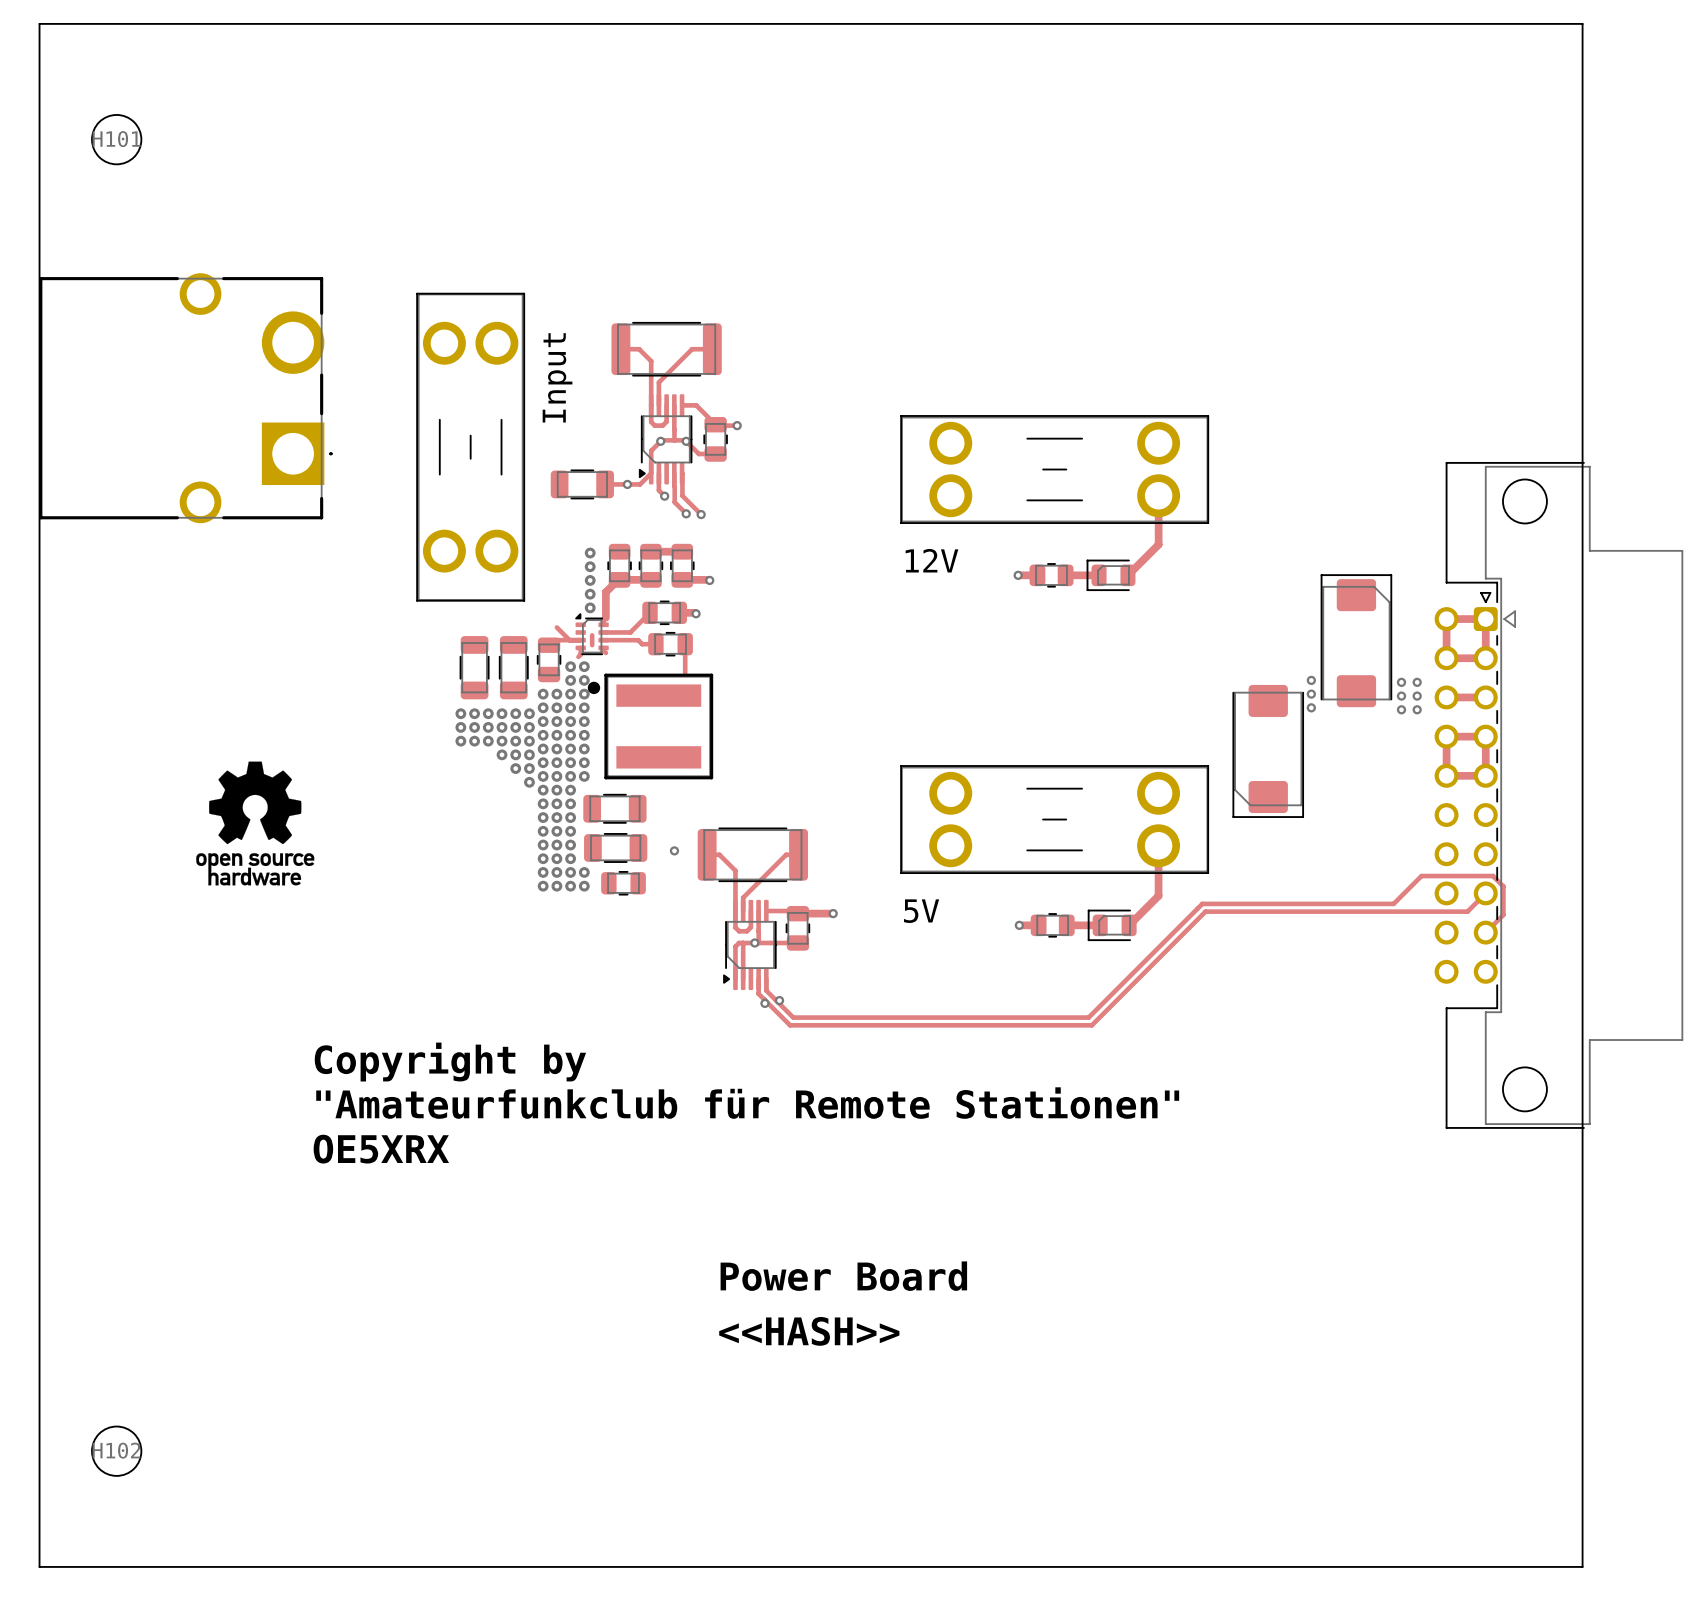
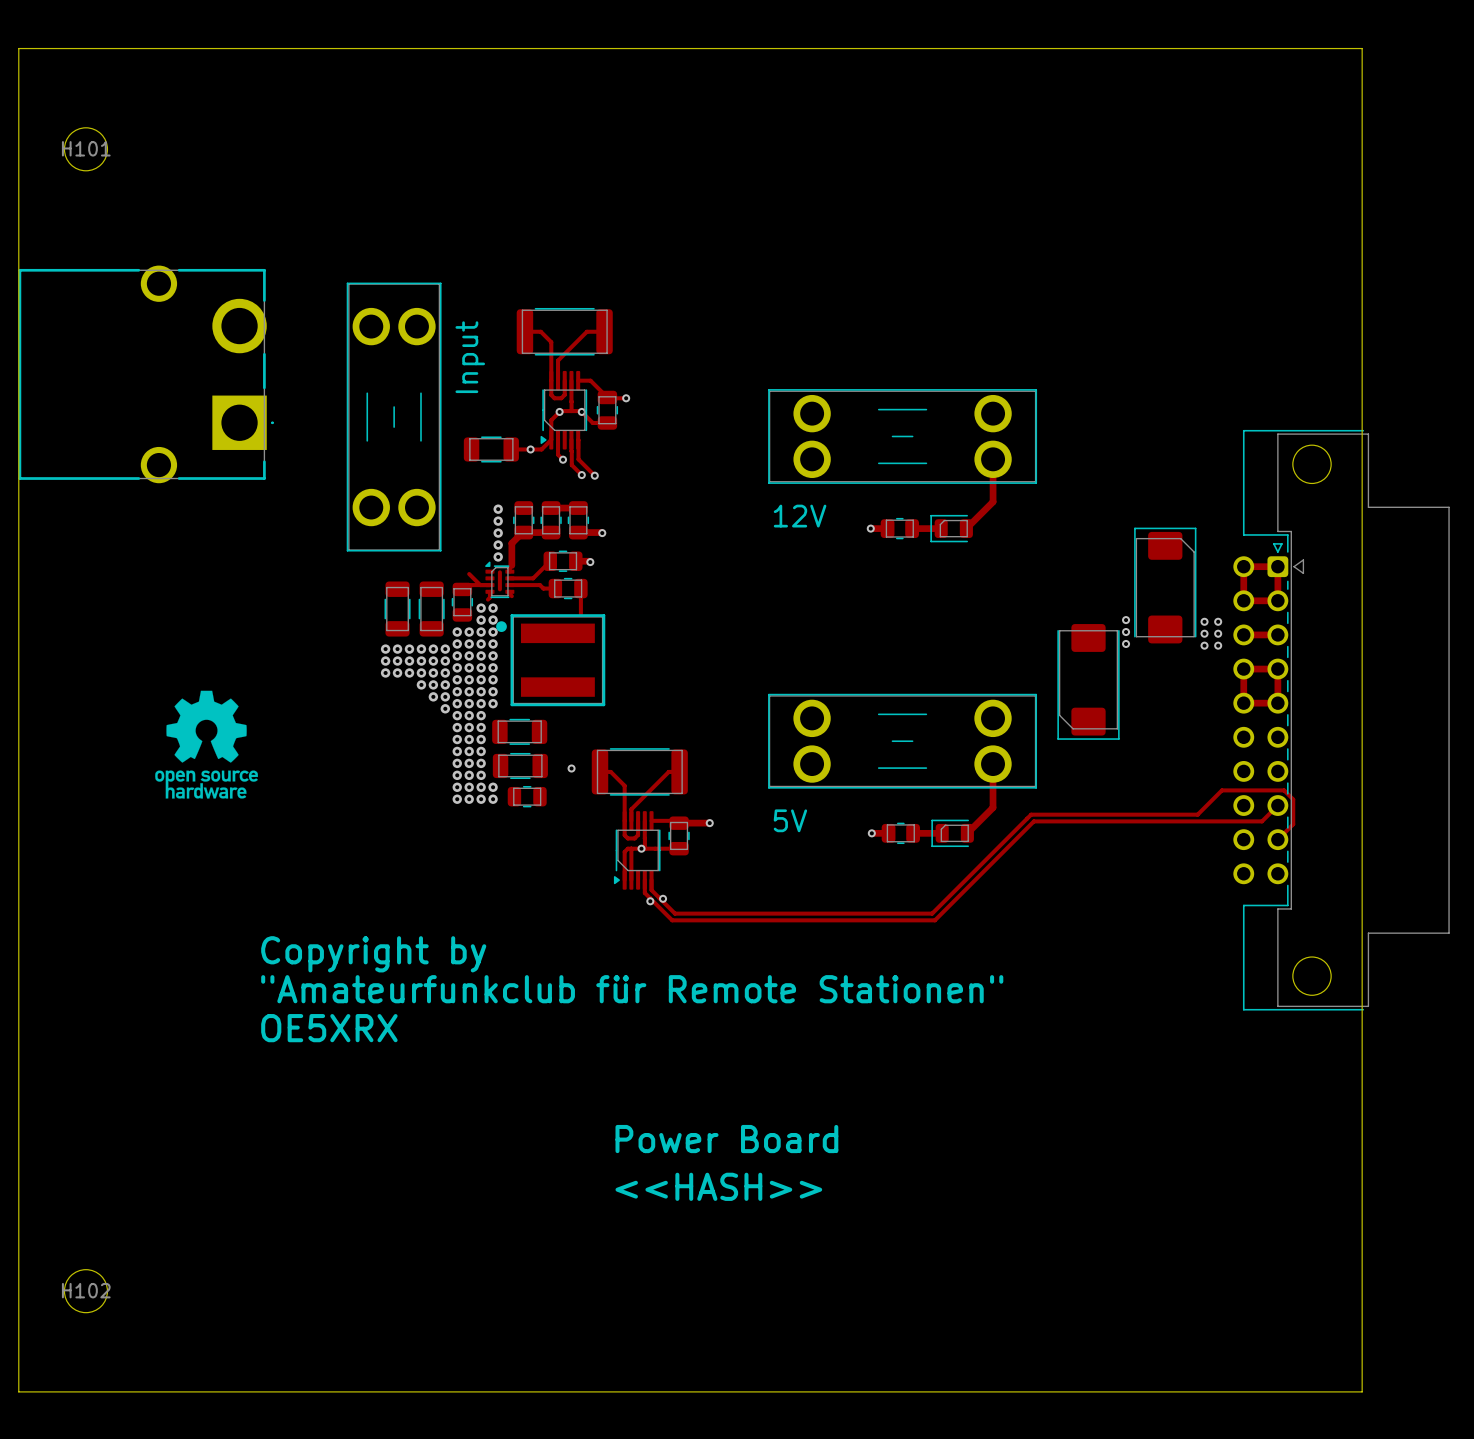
track: none -> (499, 572) (499, 580)

